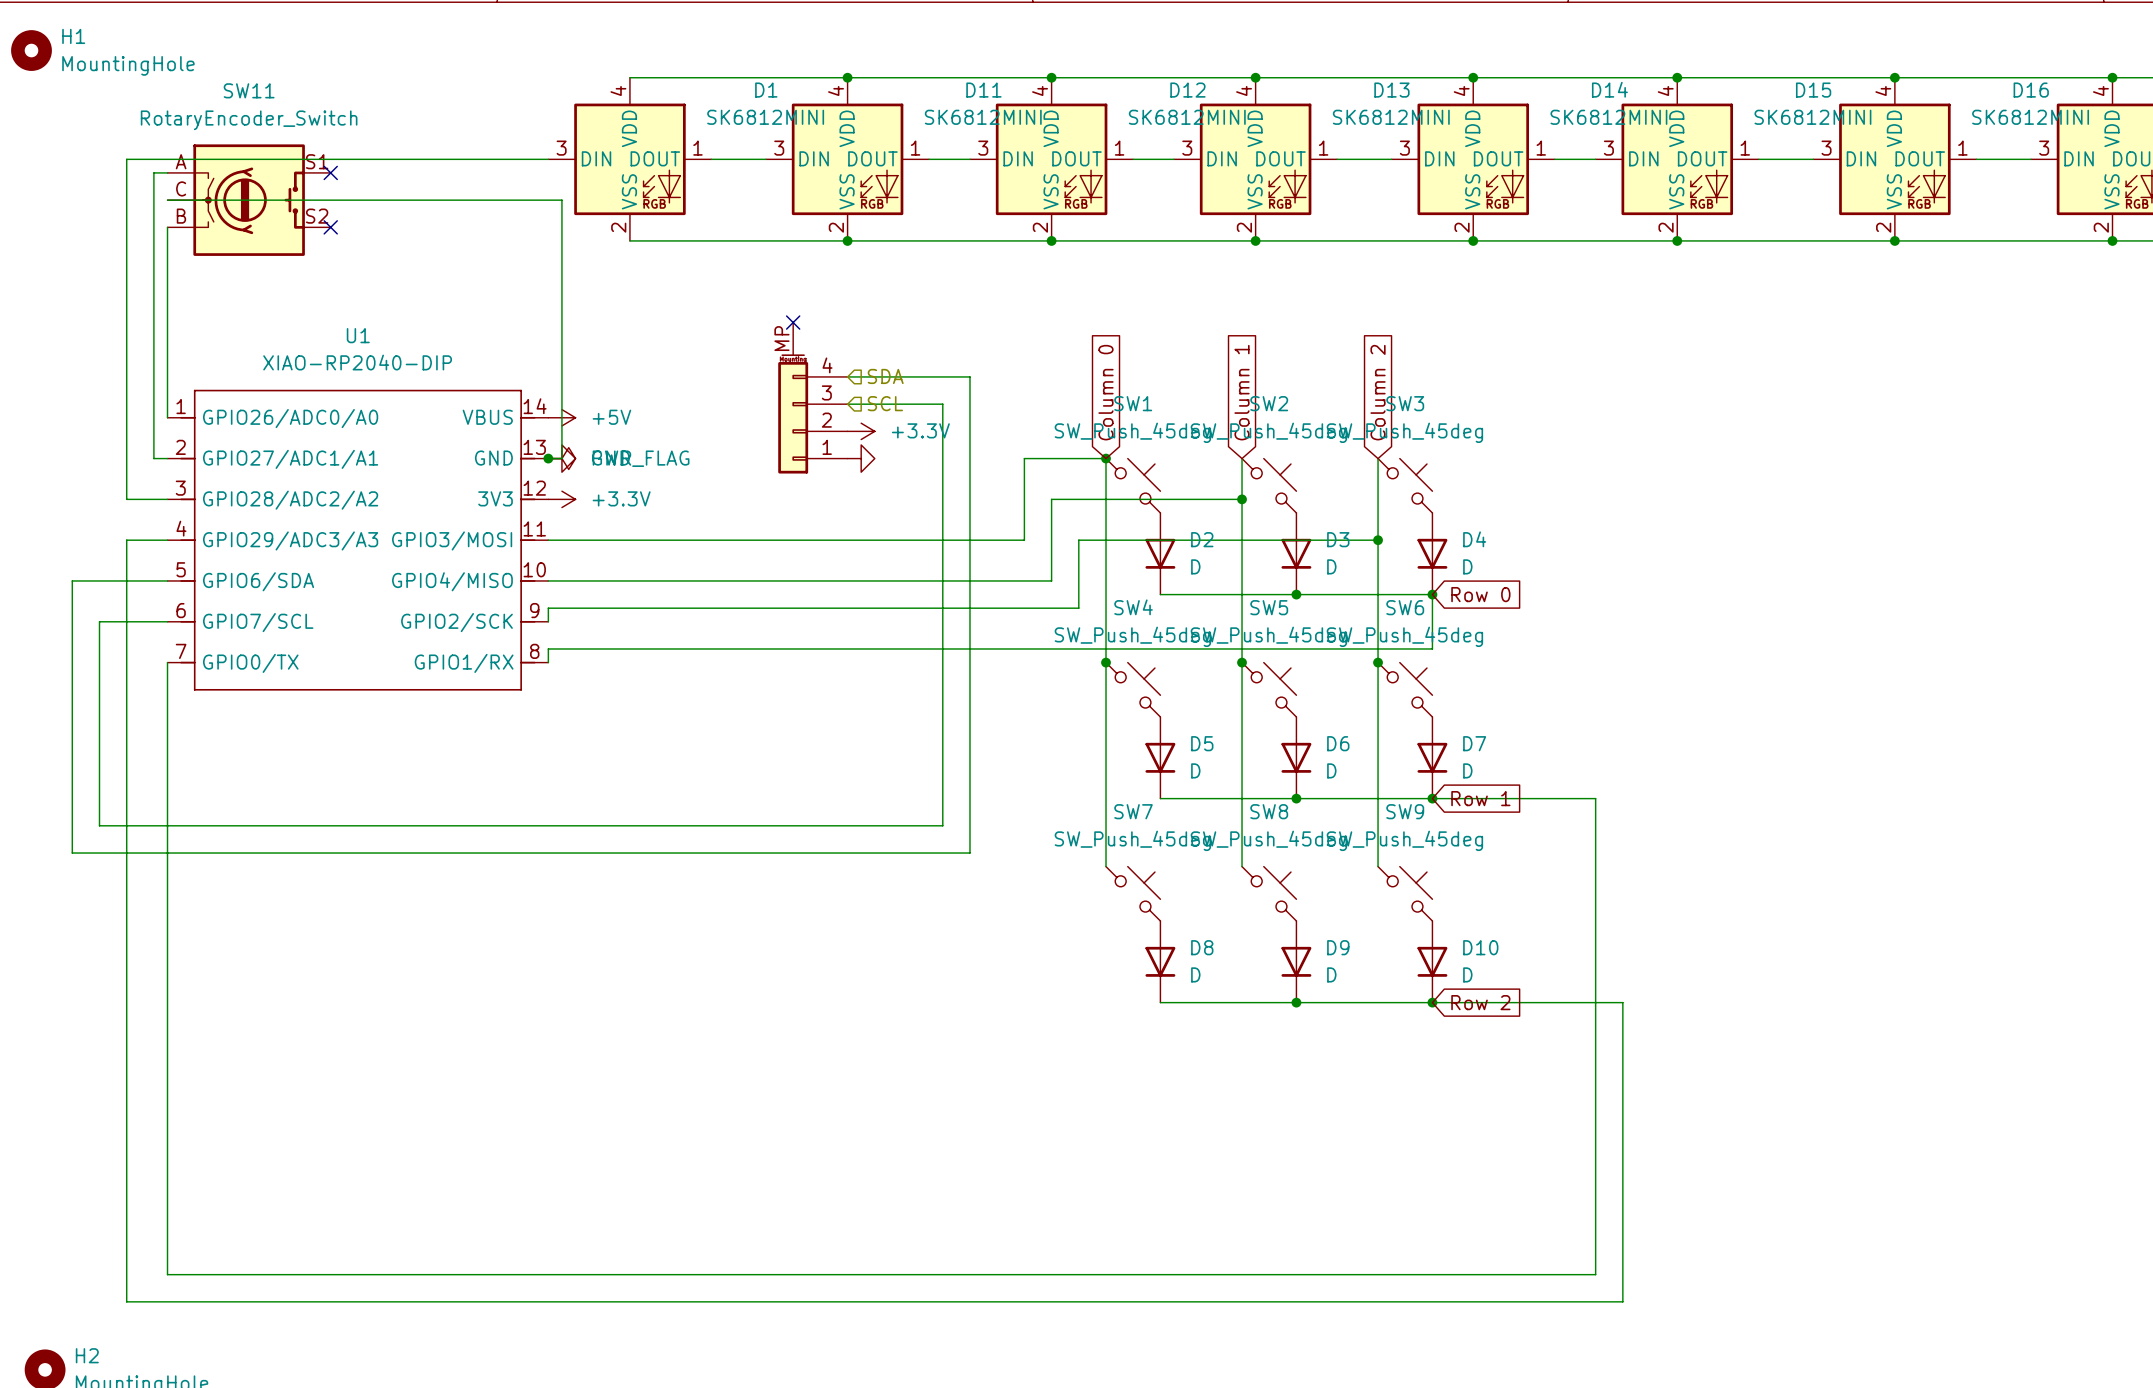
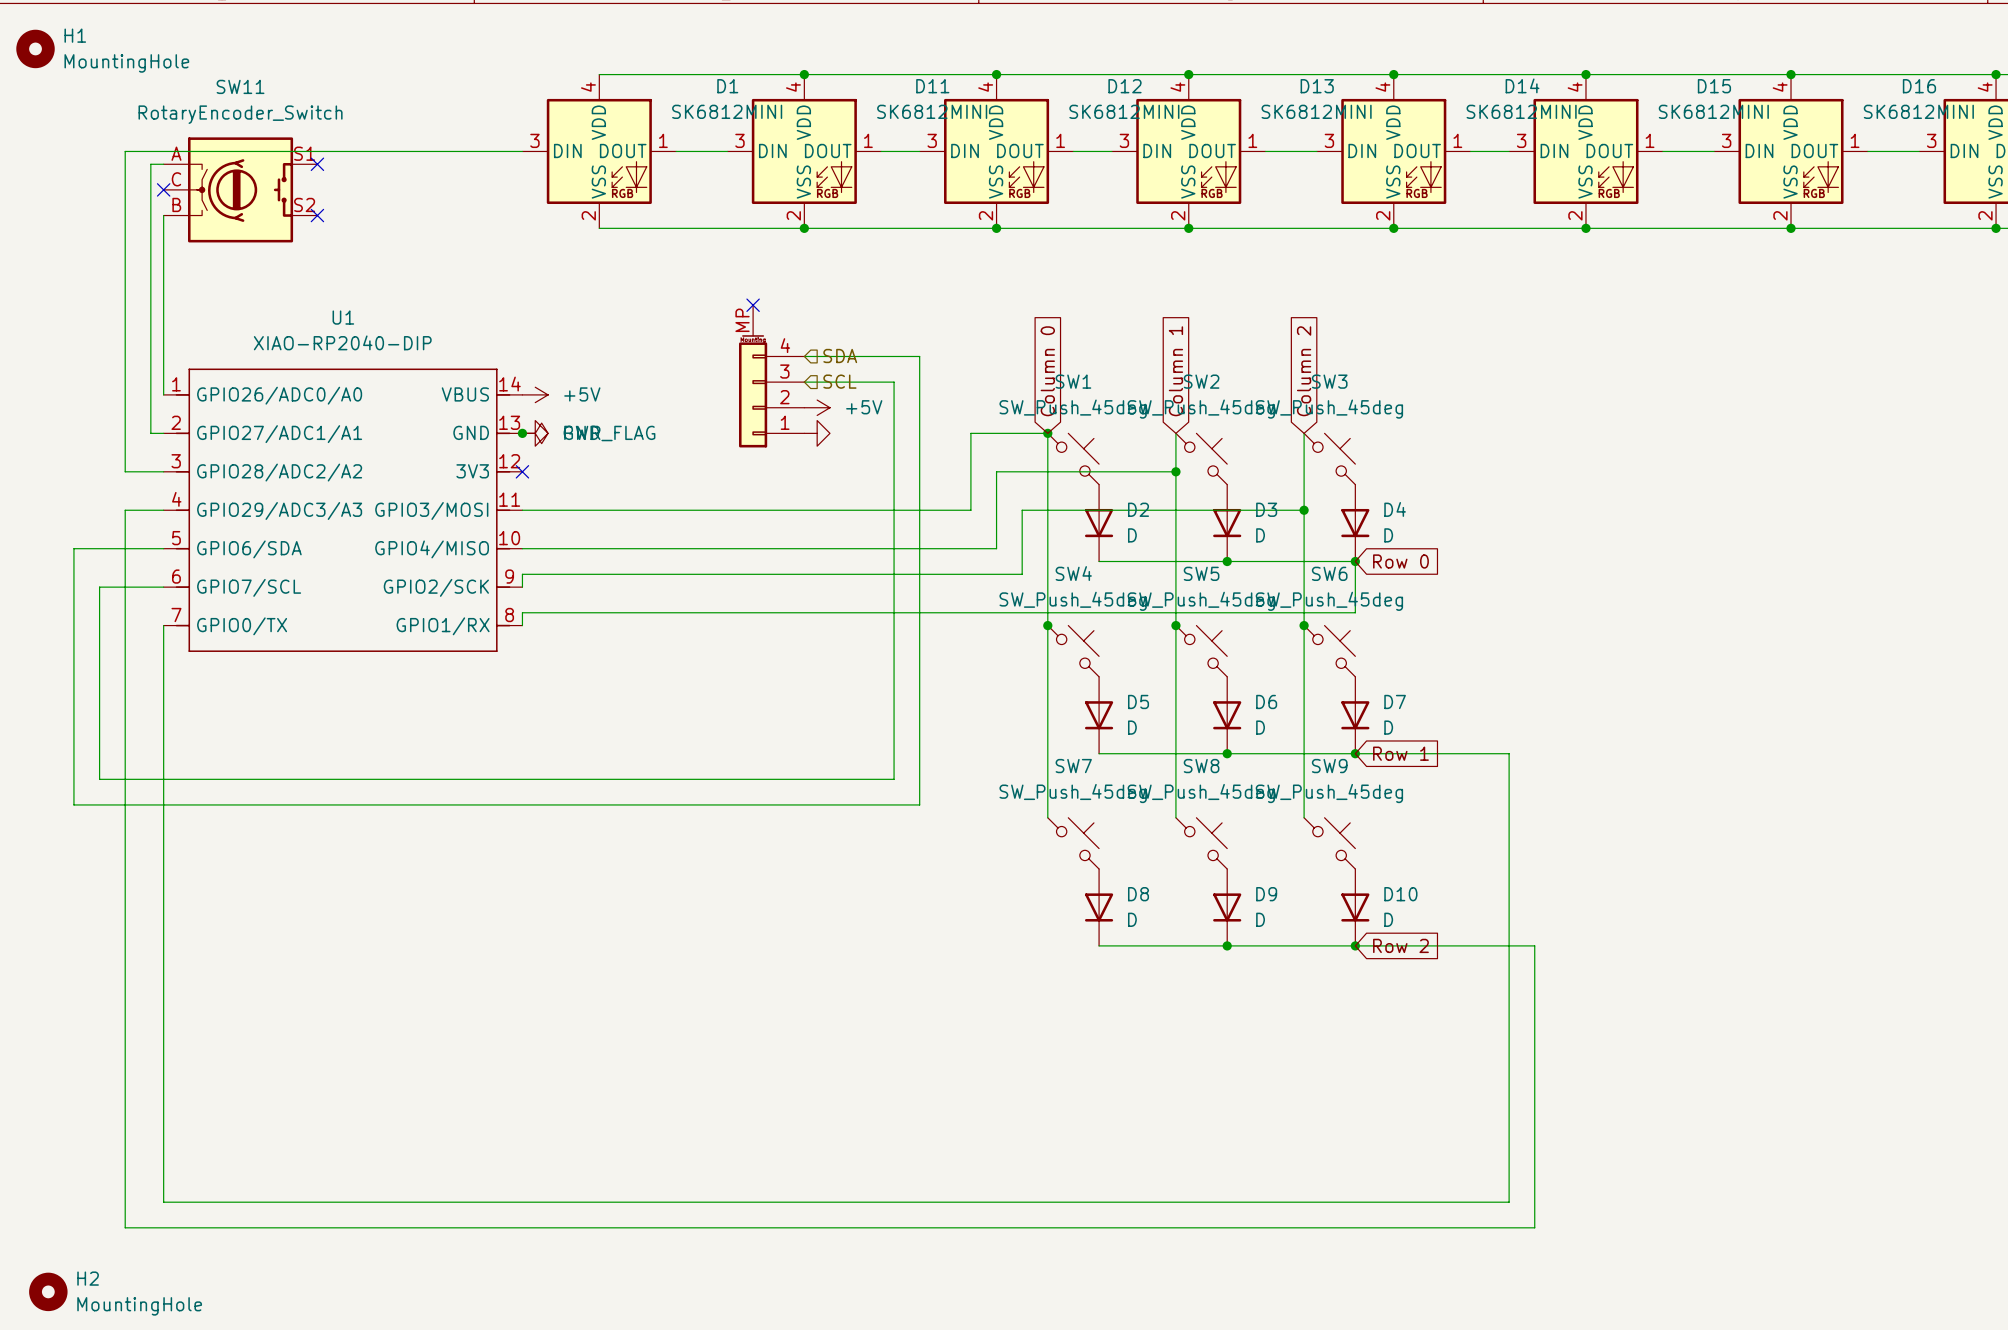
wire: (167, 200) (561, 200) (561, 458) (548, 458) -> none
no-connect mark: none -> (163, 189)
power symbol: +3.3V (861, 431) -> +5V (817, 407)
no-connect mark: none -> (522, 471)
power symbol: +3.3V (561, 499) -> none

